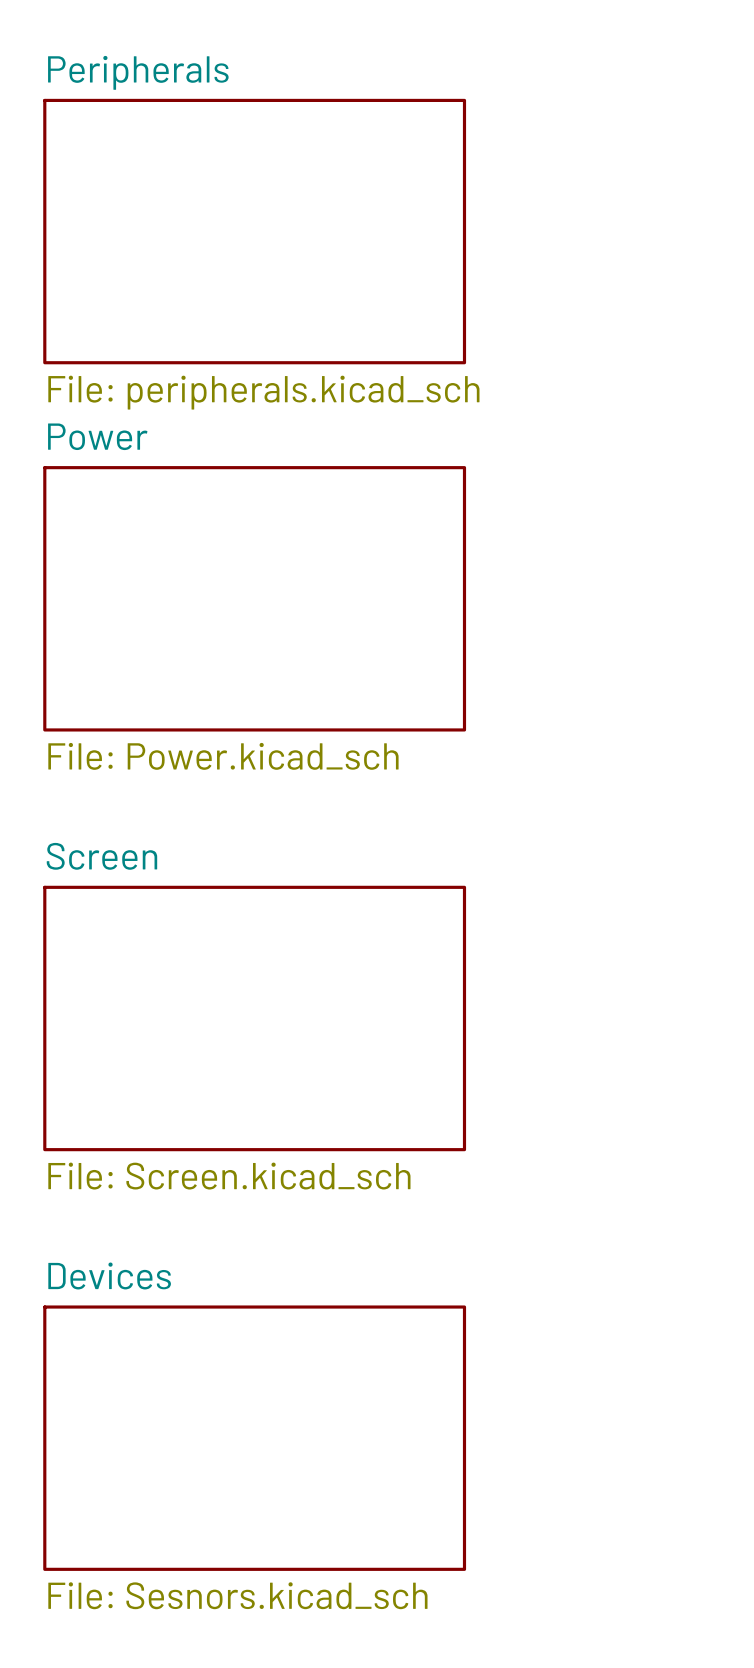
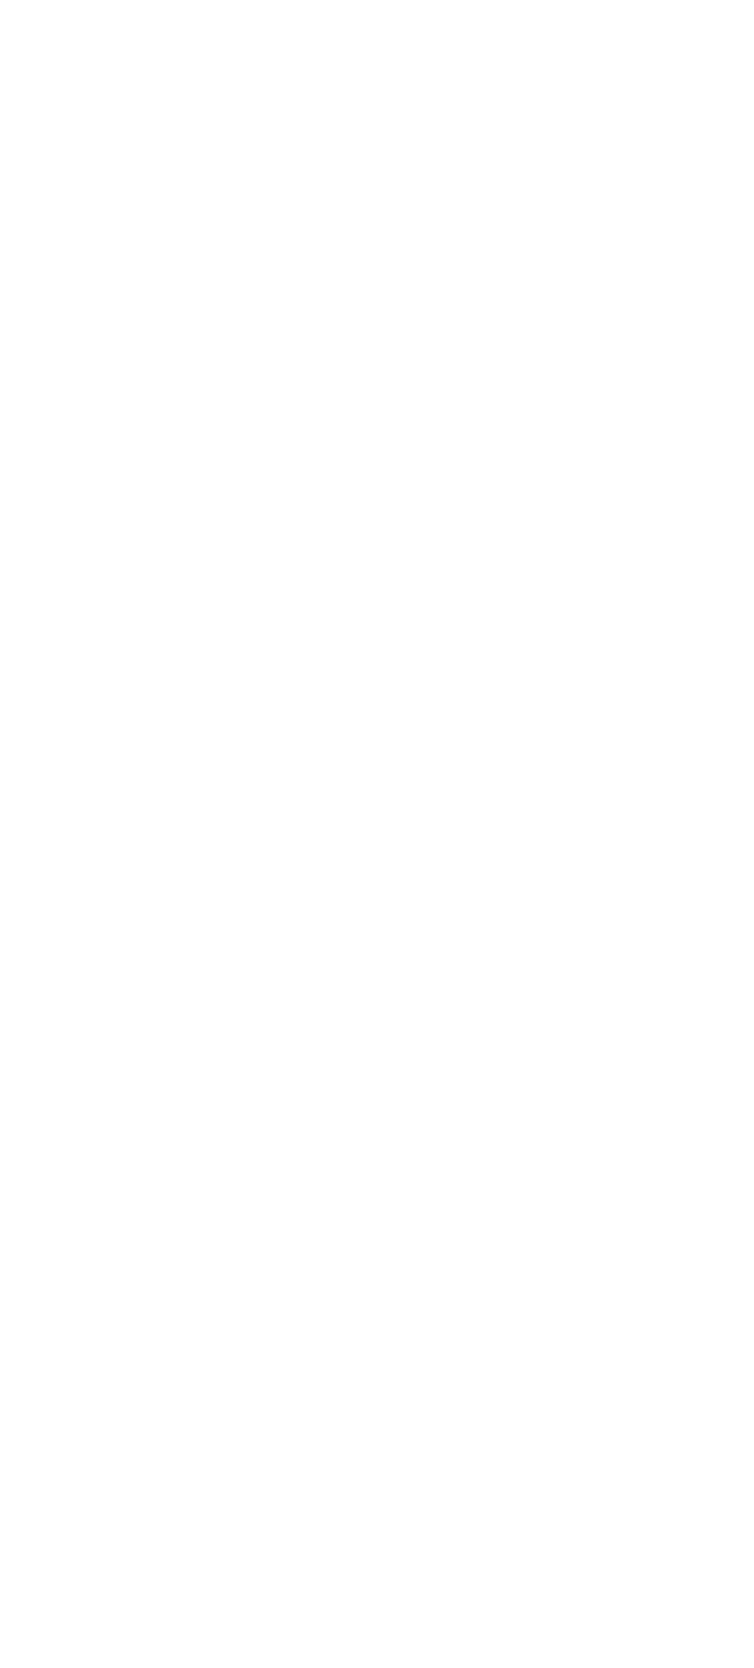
sheet Peripherals: File: peripherals.kicad_sch (254, 231) -> none
sheet Power: File: Power.kicad_sch (254, 598) -> none
sheet Screen: File: Screen.kicad_sch (254, 1018) -> none
sheet Devices: File: Sesnors.kicad_sch (254, 1438) -> none

